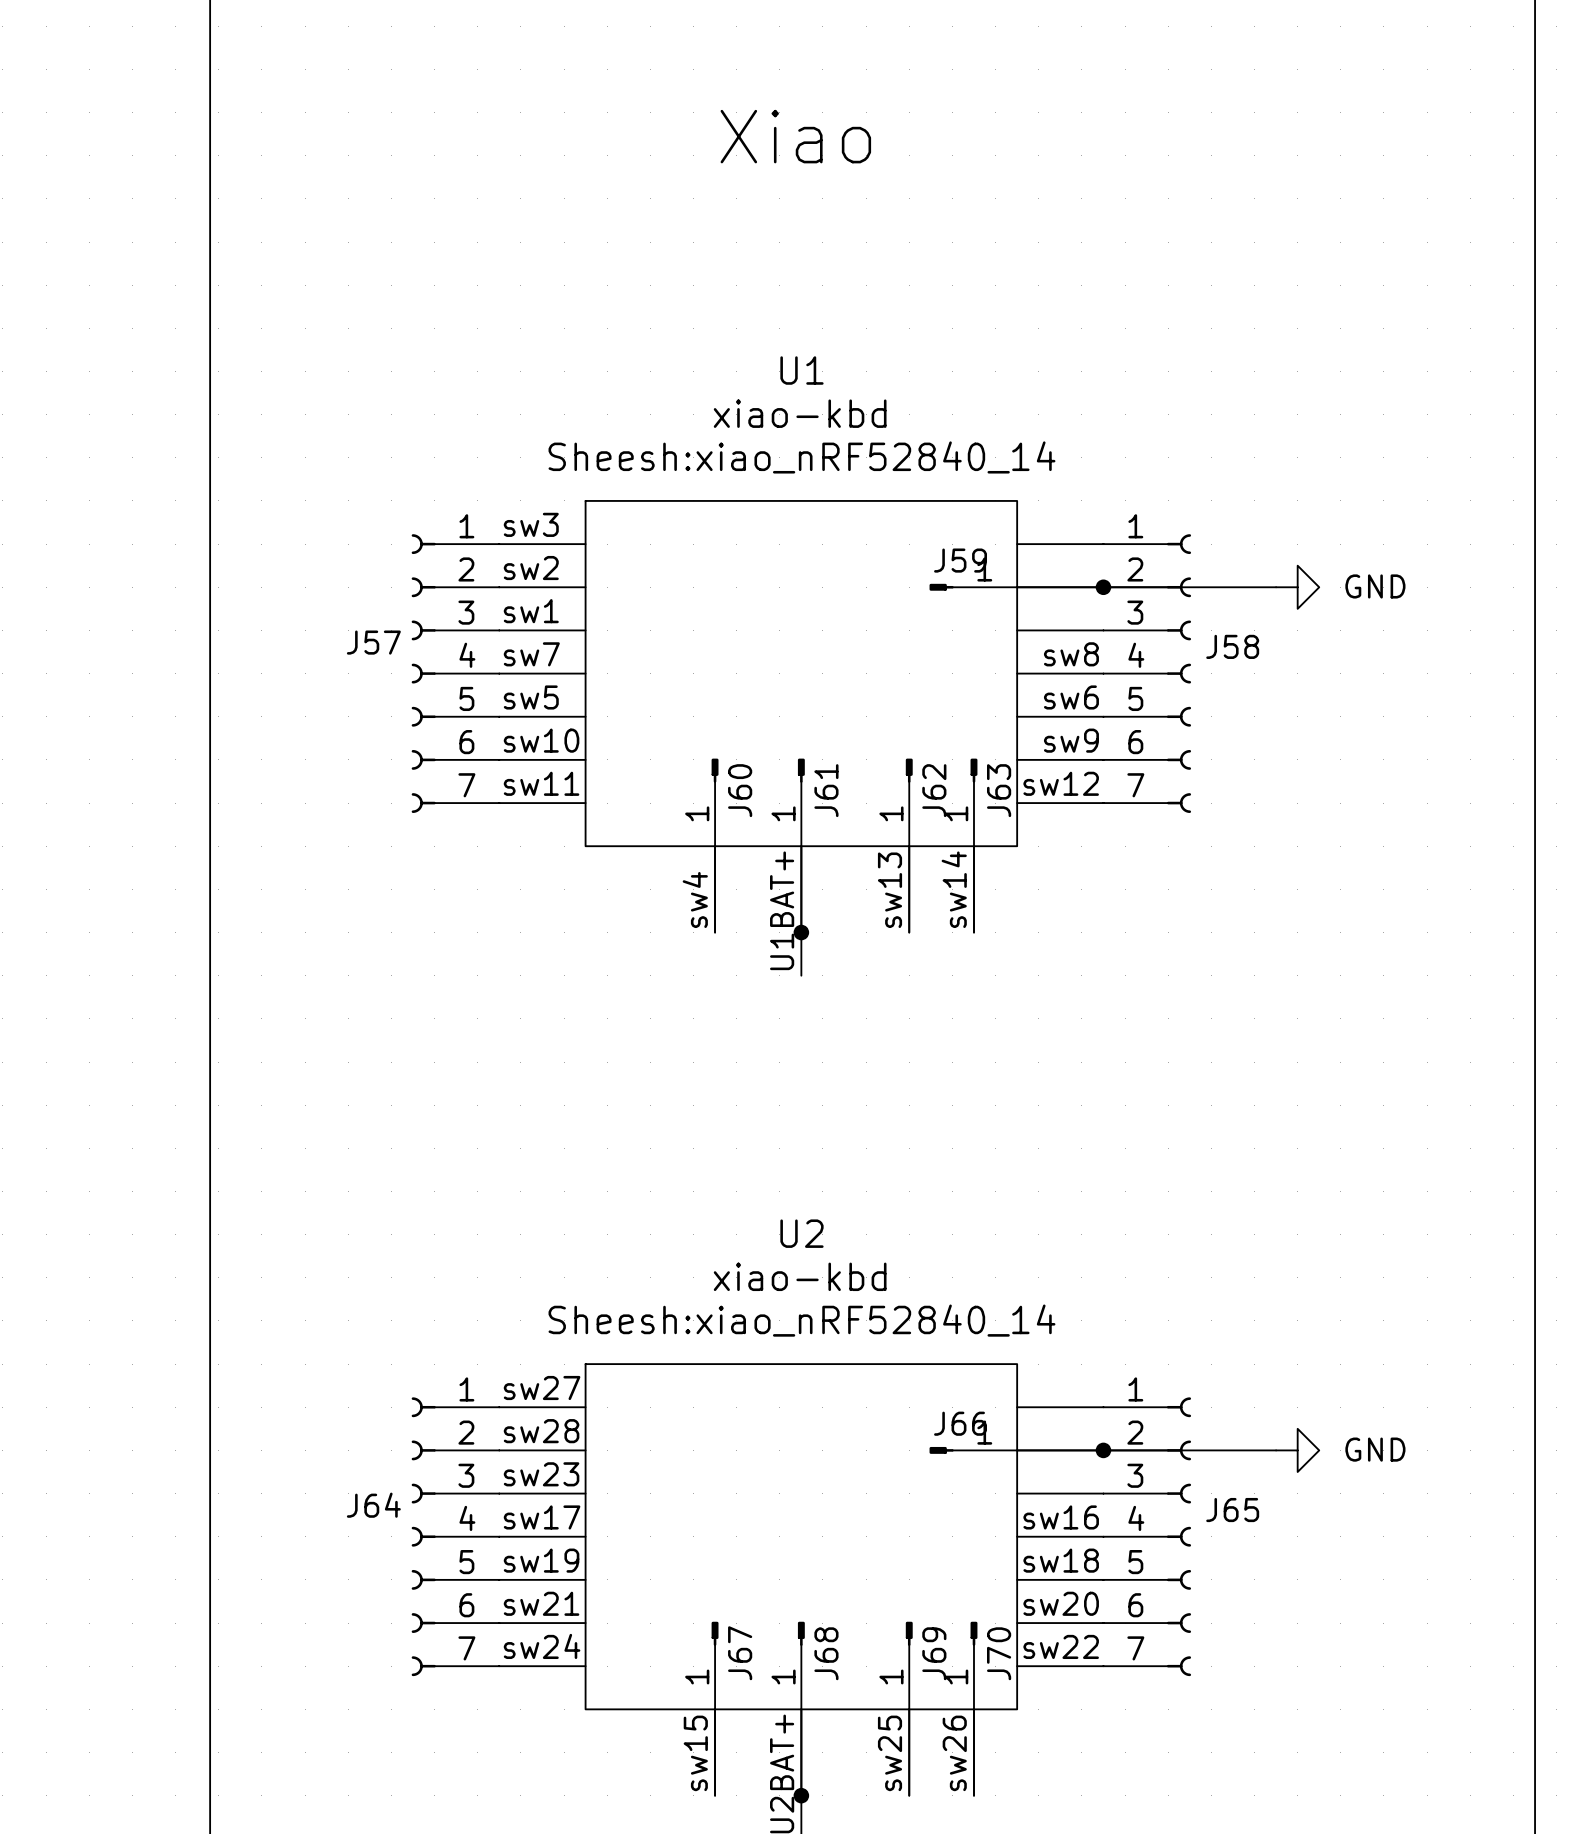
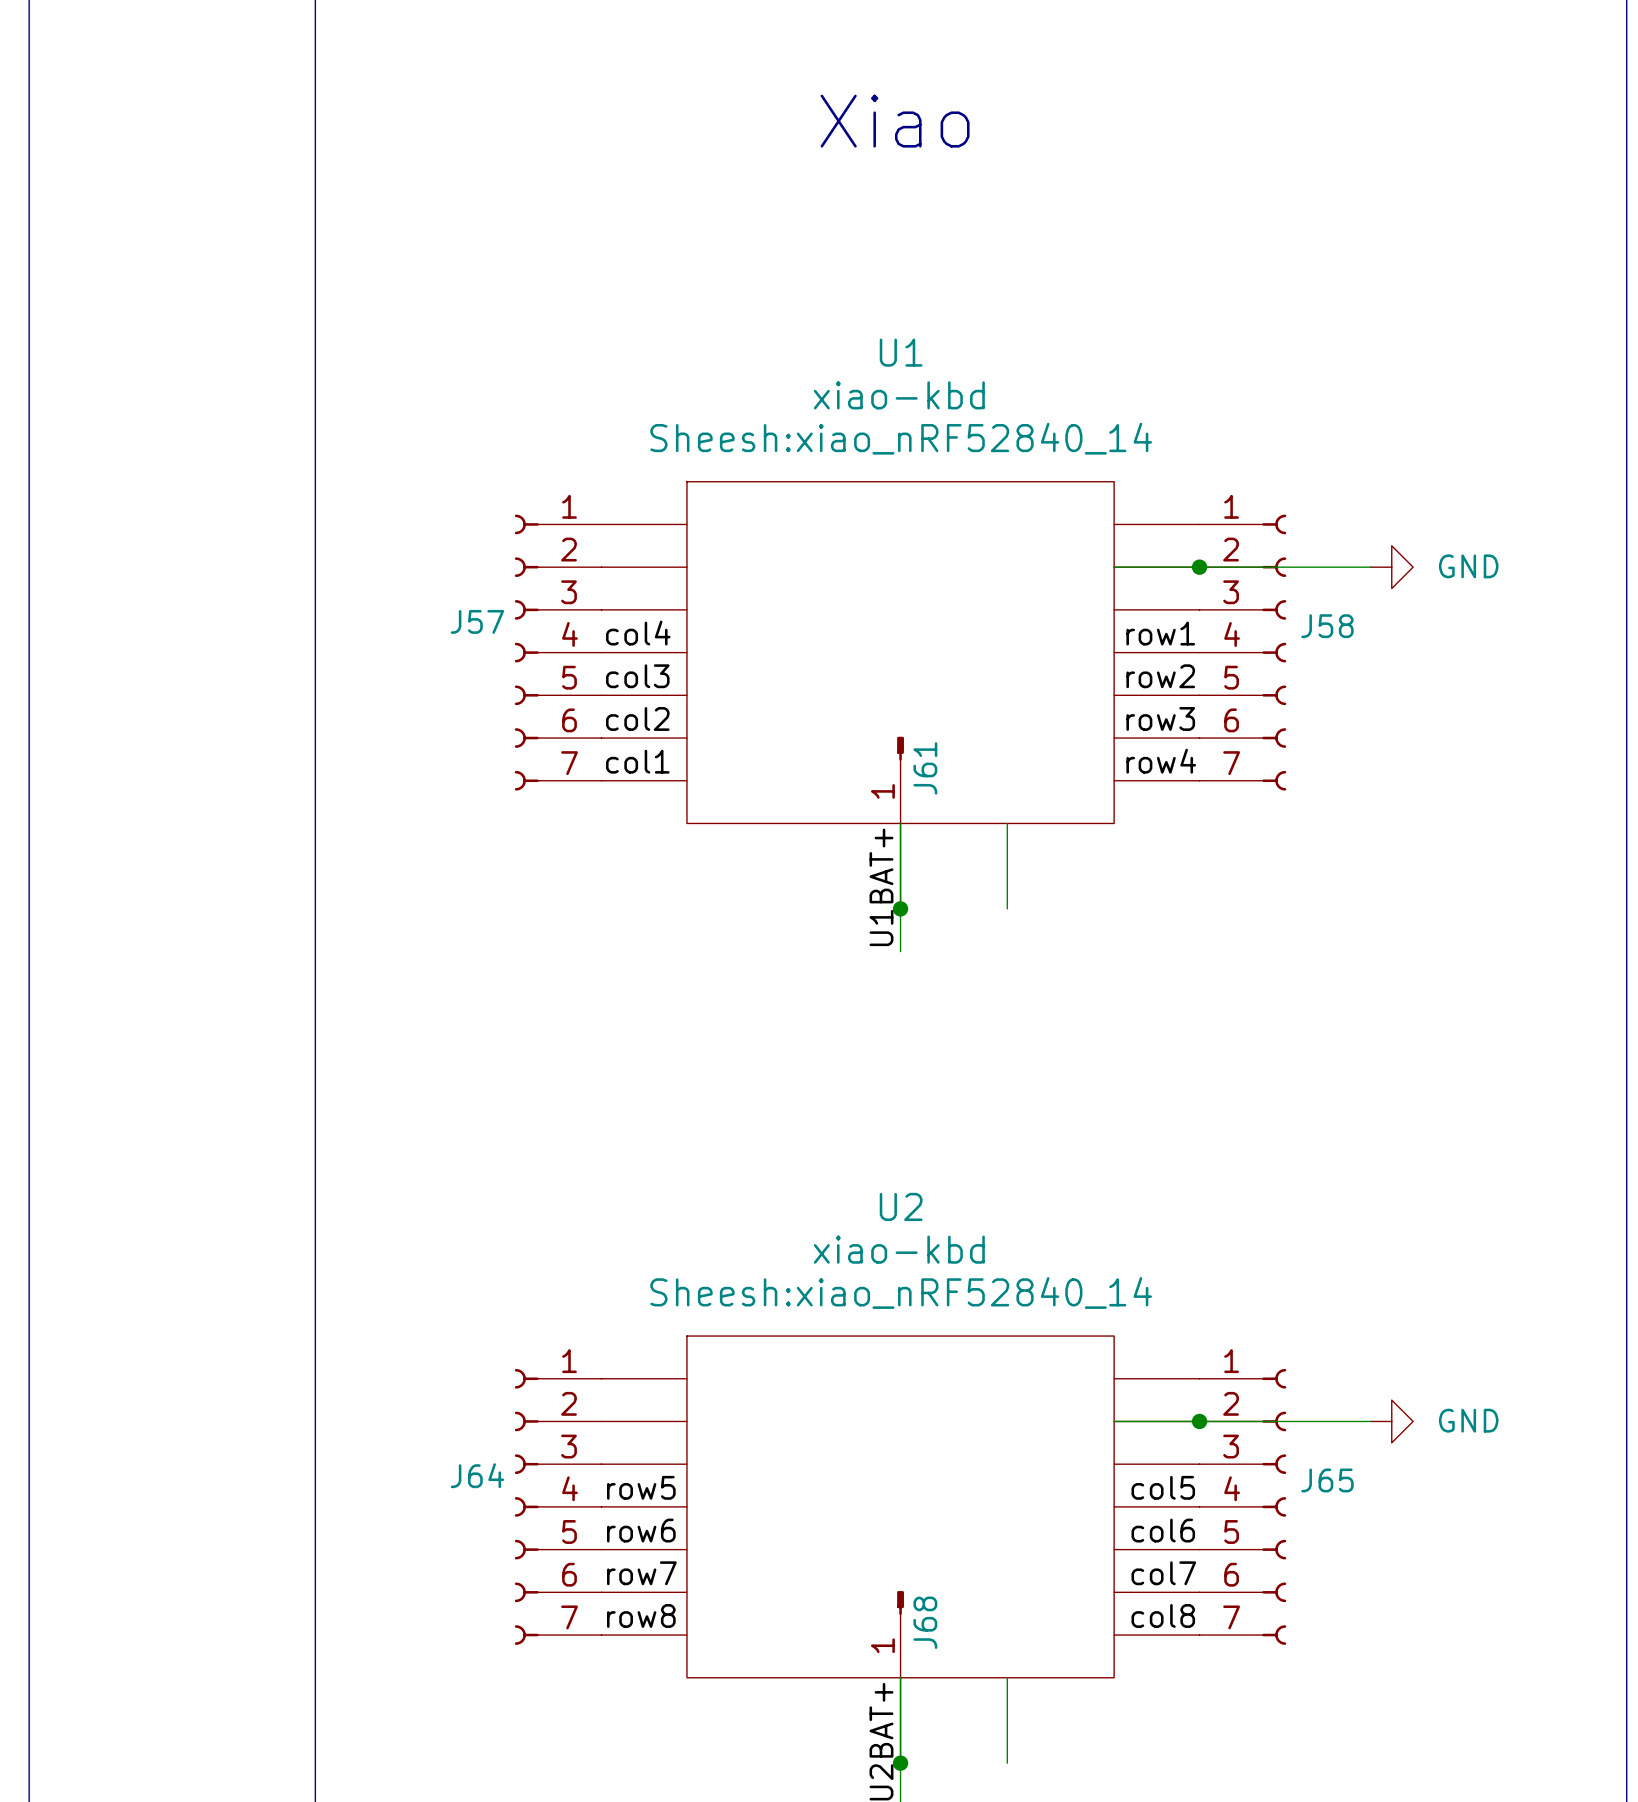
U1 symbol: [499, 500, 1104, 933] -> [601, 481, 1200, 909]
label: sw3 (531, 524) -> none
label: sw2 (531, 568) -> none
J59: (973, 587) -> none
label: sw1 (531, 611) -> none
label: sw7 (531, 654) -> col4 (638, 633)
label: sw8 (1071, 654) -> row1 (1160, 633)
label: sw5 (531, 697) -> col3 (637, 676)
label: sw6 (1071, 697) -> row2 (1160, 676)
label: sw10 (541, 740) -> col2 (637, 718)
label: sw9 (1071, 740) -> row3 (1160, 718)
label: sw11 (541, 783) -> col1 (637, 761)
label: sw12 (1061, 783) -> row4 (1161, 761)
J60: (715, 802) -> none
J62: (909, 802) -> none
J63: (973, 802) -> none
label: sw14 (954, 889) -> none
label: sw13 (890, 890) -> none
label: sw4 (695, 900) -> none
U2 symbol: [499, 1364, 1104, 1796] -> [601, 1336, 1200, 1764]
label: sw27 (542, 1388) -> none
label: sw28 (541, 1431) -> none
J66: (973, 1450) -> none
label: sw23 (541, 1474) -> none
label: sw17 (542, 1517) -> row5 (641, 1487)
label: sw16 (1061, 1517) -> col5 (1163, 1487)
label: sw19 (541, 1560) -> row6 (641, 1530)
label: sw18 (1061, 1560) -> col6 (1163, 1530)
label: sw21 (541, 1603) -> row7 (641, 1573)
label: sw20 (1061, 1603) -> col7 (1163, 1573)
label: sw24 (542, 1646) -> row8 (641, 1615)
label: sw22 (1061, 1646) -> col8 (1163, 1615)
J67: (715, 1665) -> none
J69: (909, 1665) -> none
J70: (973, 1665) -> none
label: sw15 (695, 1753) -> none
label: sw25 (890, 1753) -> none
label: sw26 (954, 1753) -> none

